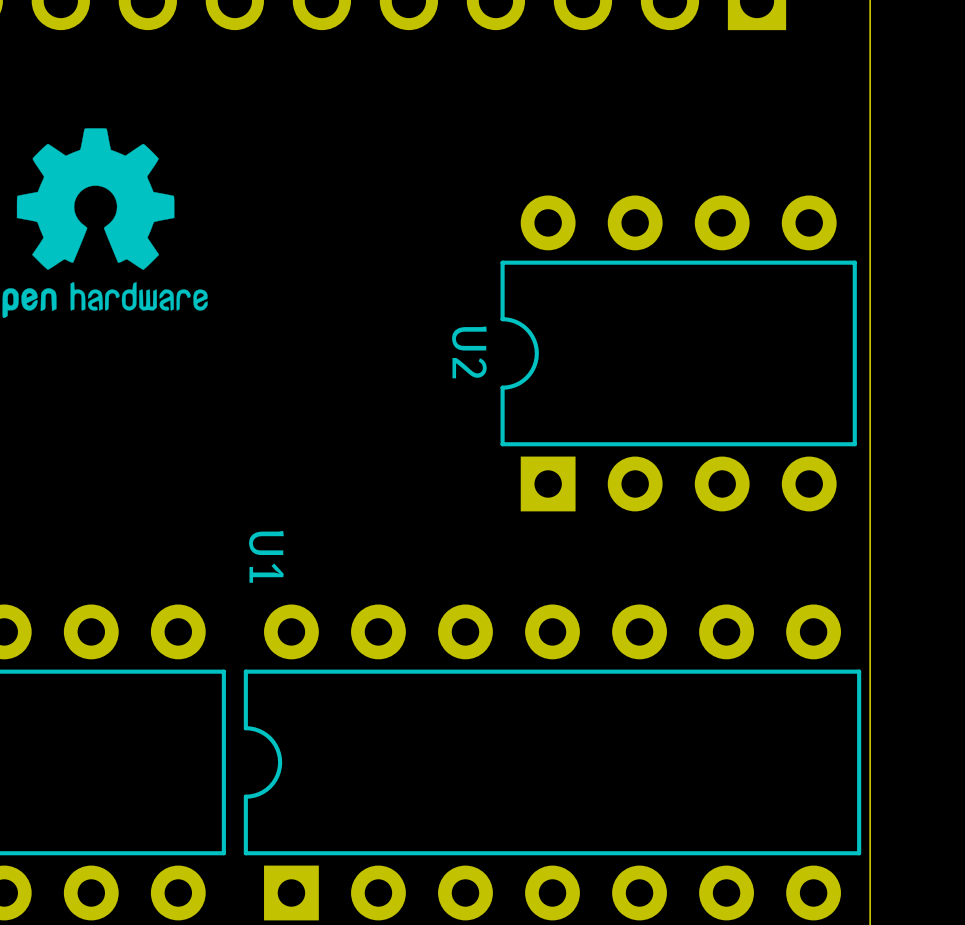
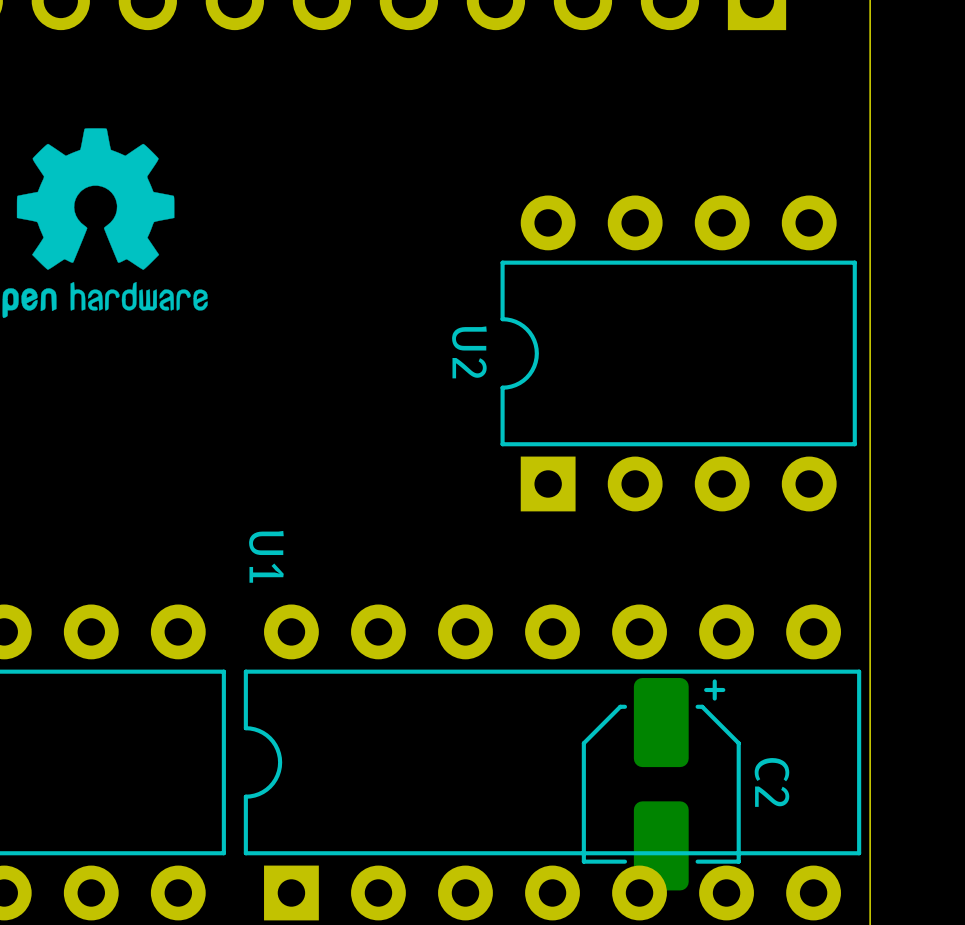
C2: none -> (661, 784)

